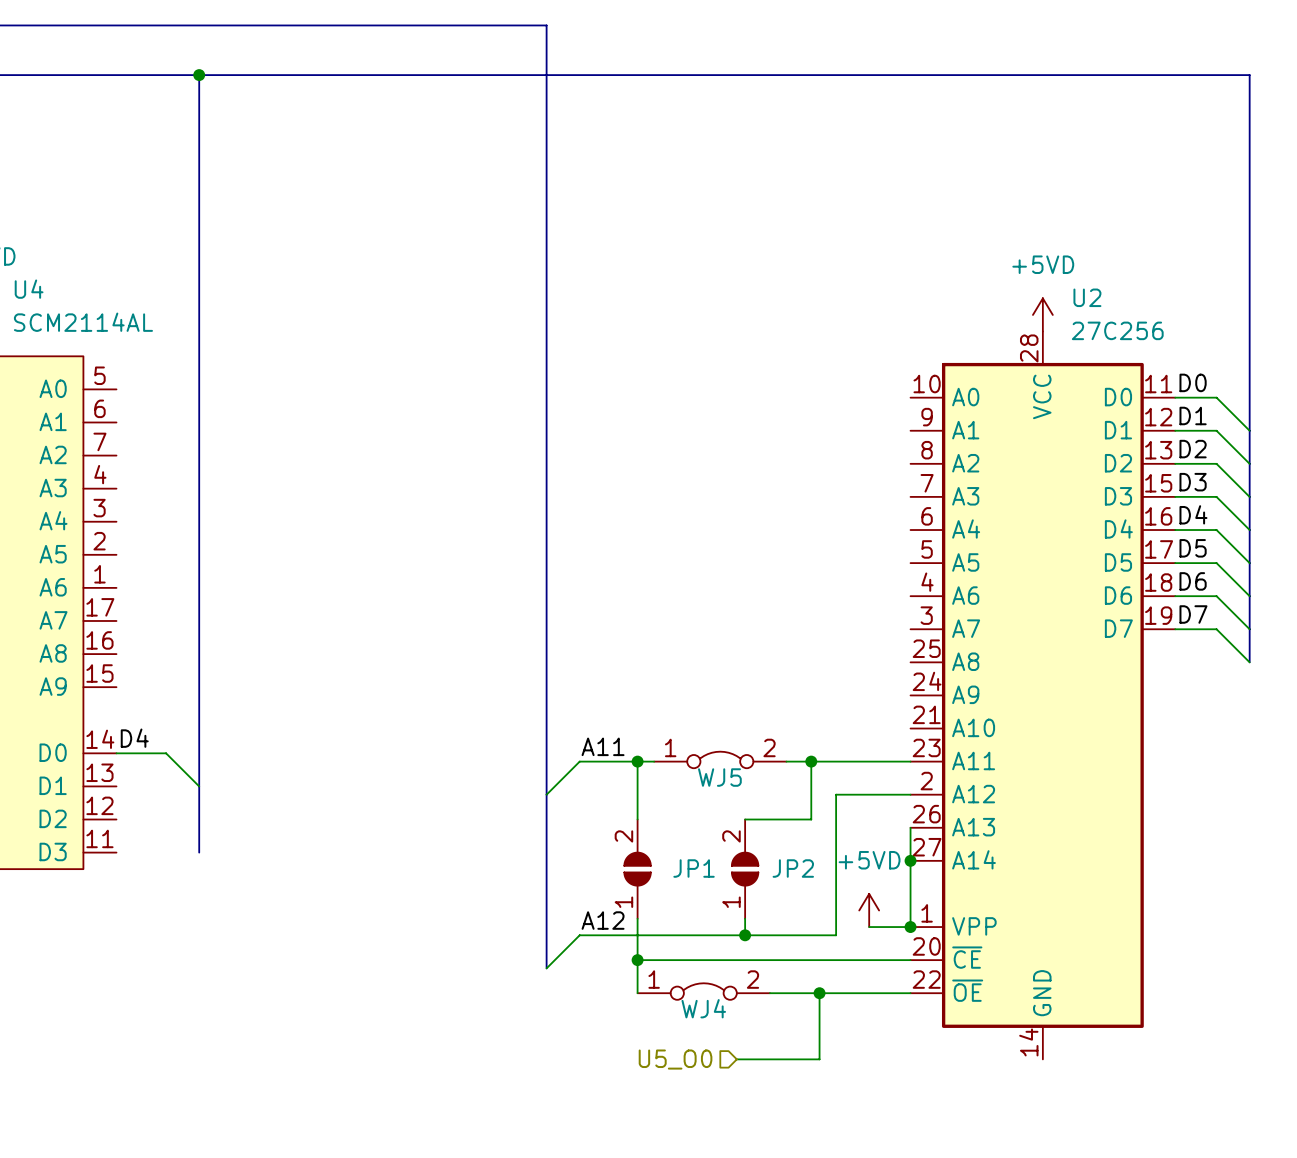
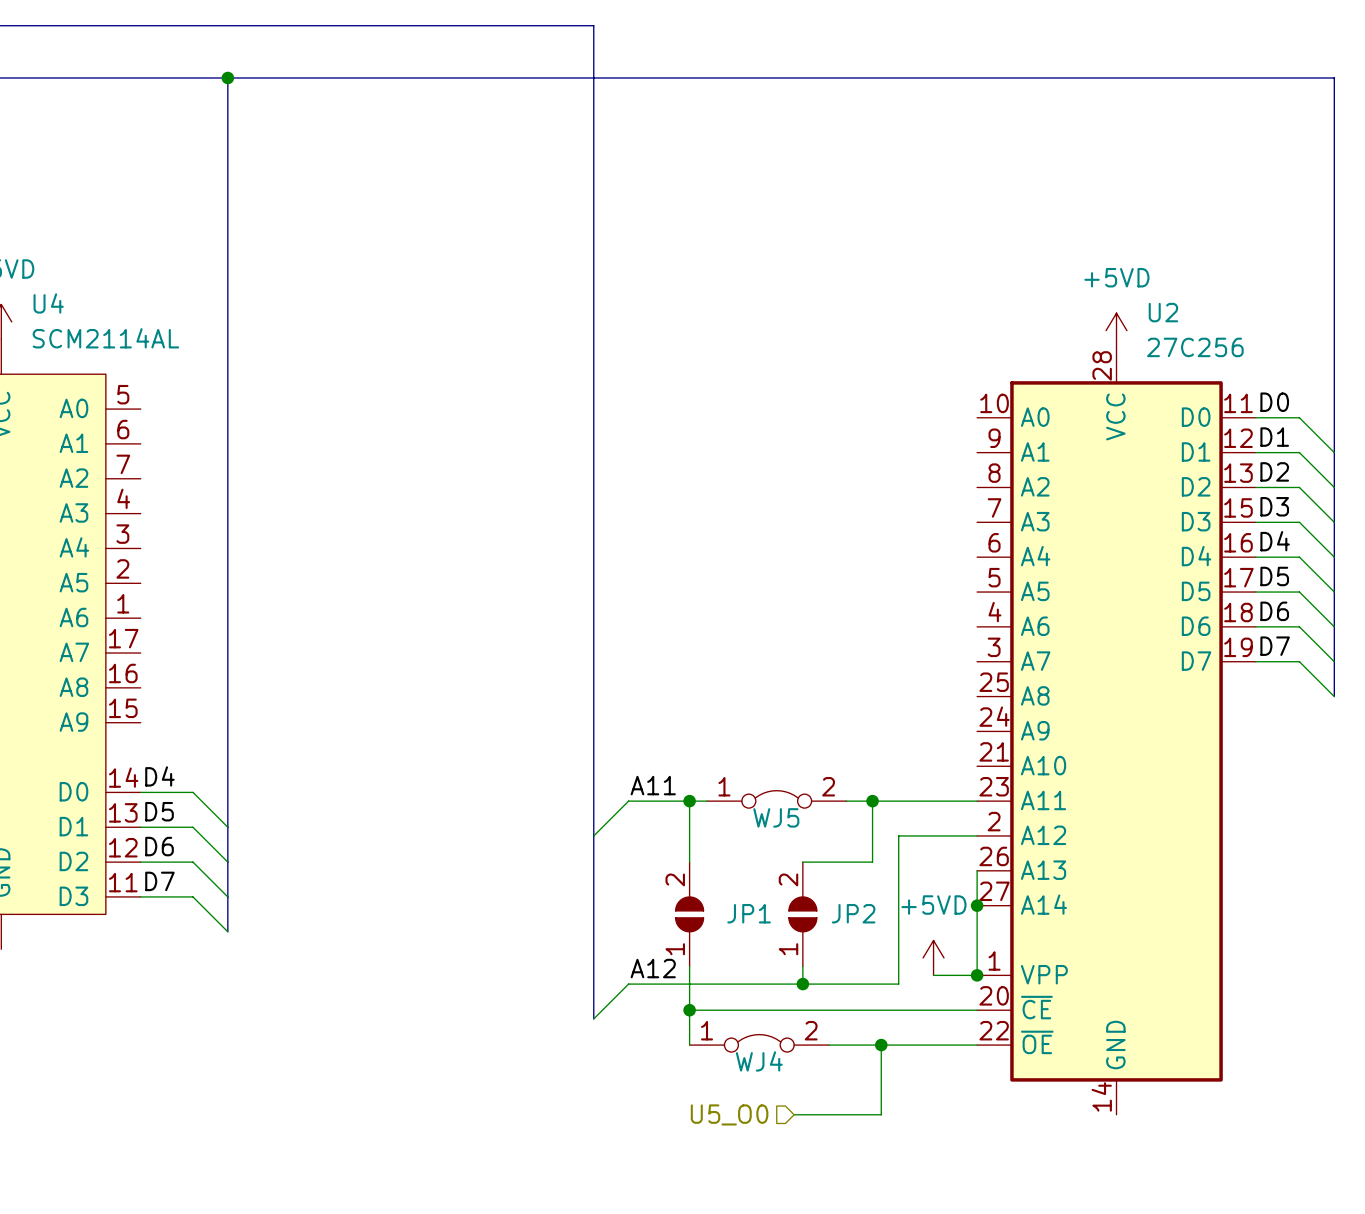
label: none -> D5 (159, 811)
wire: none -> (140, 827) (192, 827) (227, 862)
label: none -> D6 (159, 846)
wire: none -> (140, 862) (192, 862) (227, 896)
label: none -> D7 (159, 881)
wire: none -> (140, 896) (192, 896) (227, 931)
bus: none -> (227, 896) (227, 931)

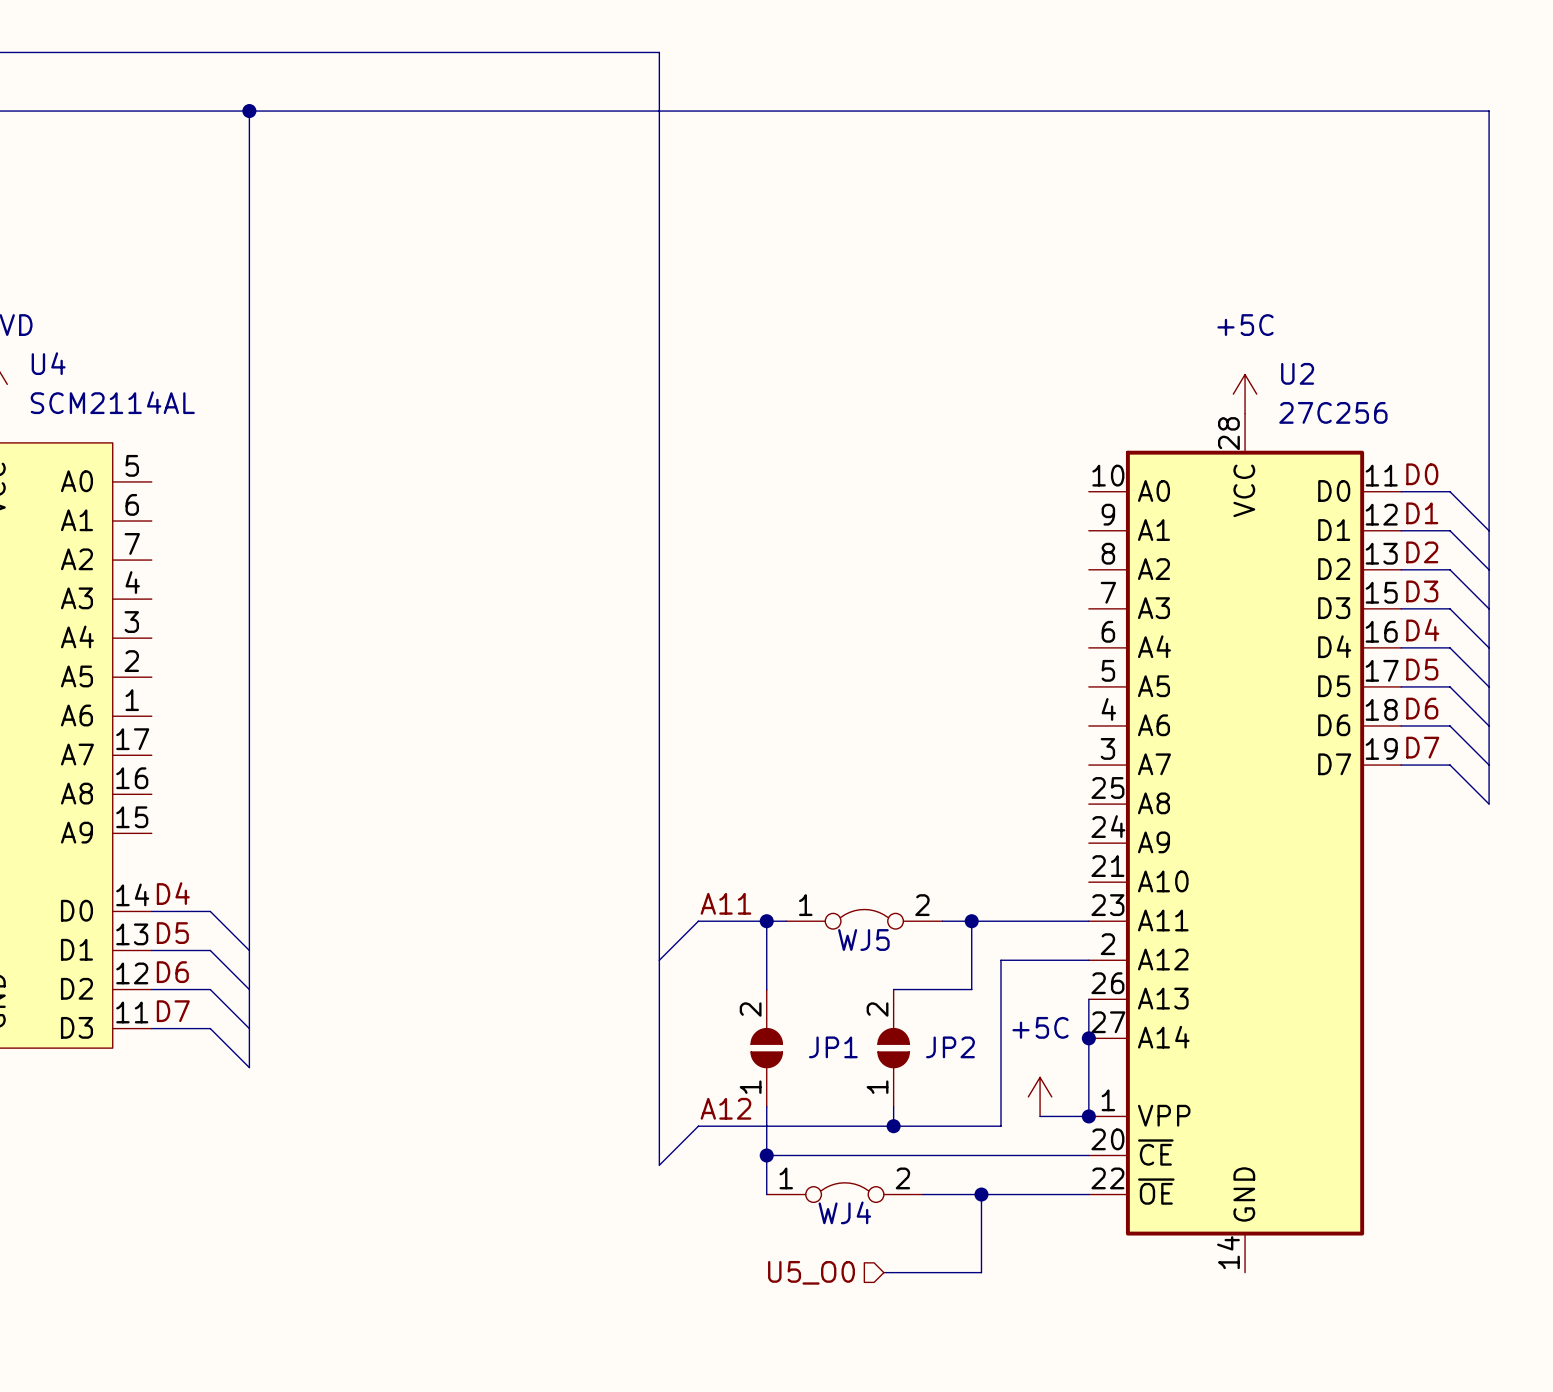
power symbol: +5VD (1116, 330) -> +5C (1245, 394)
power symbol: +5VD (933, 957) -> +5C (1040, 1096)

